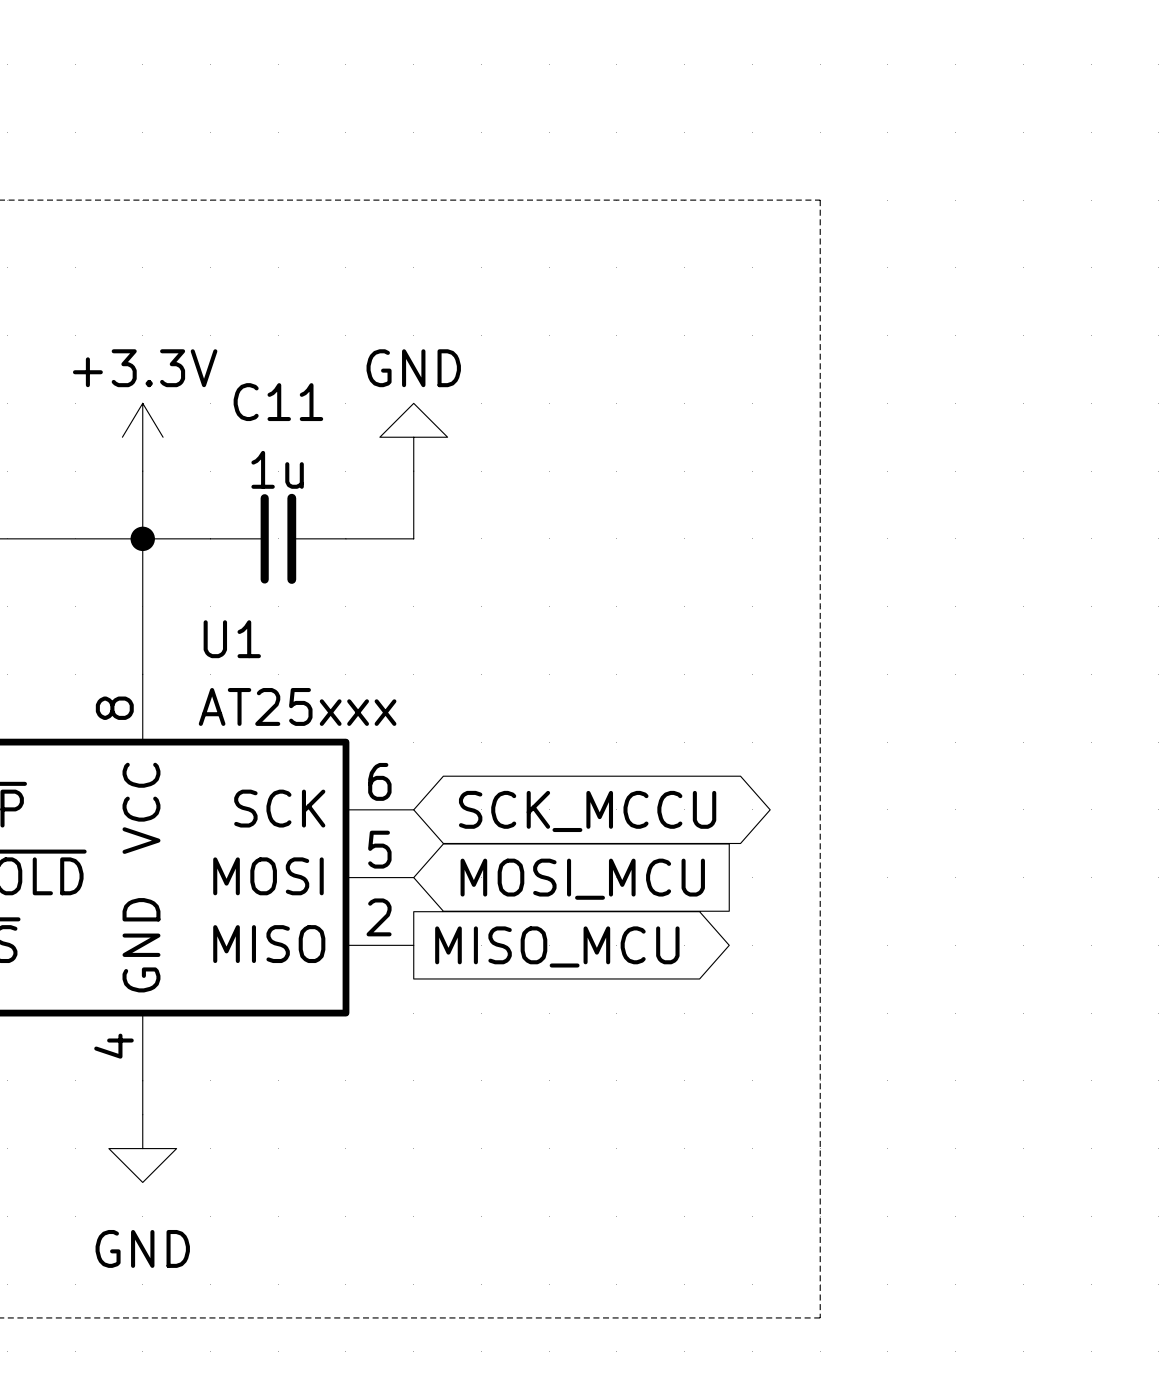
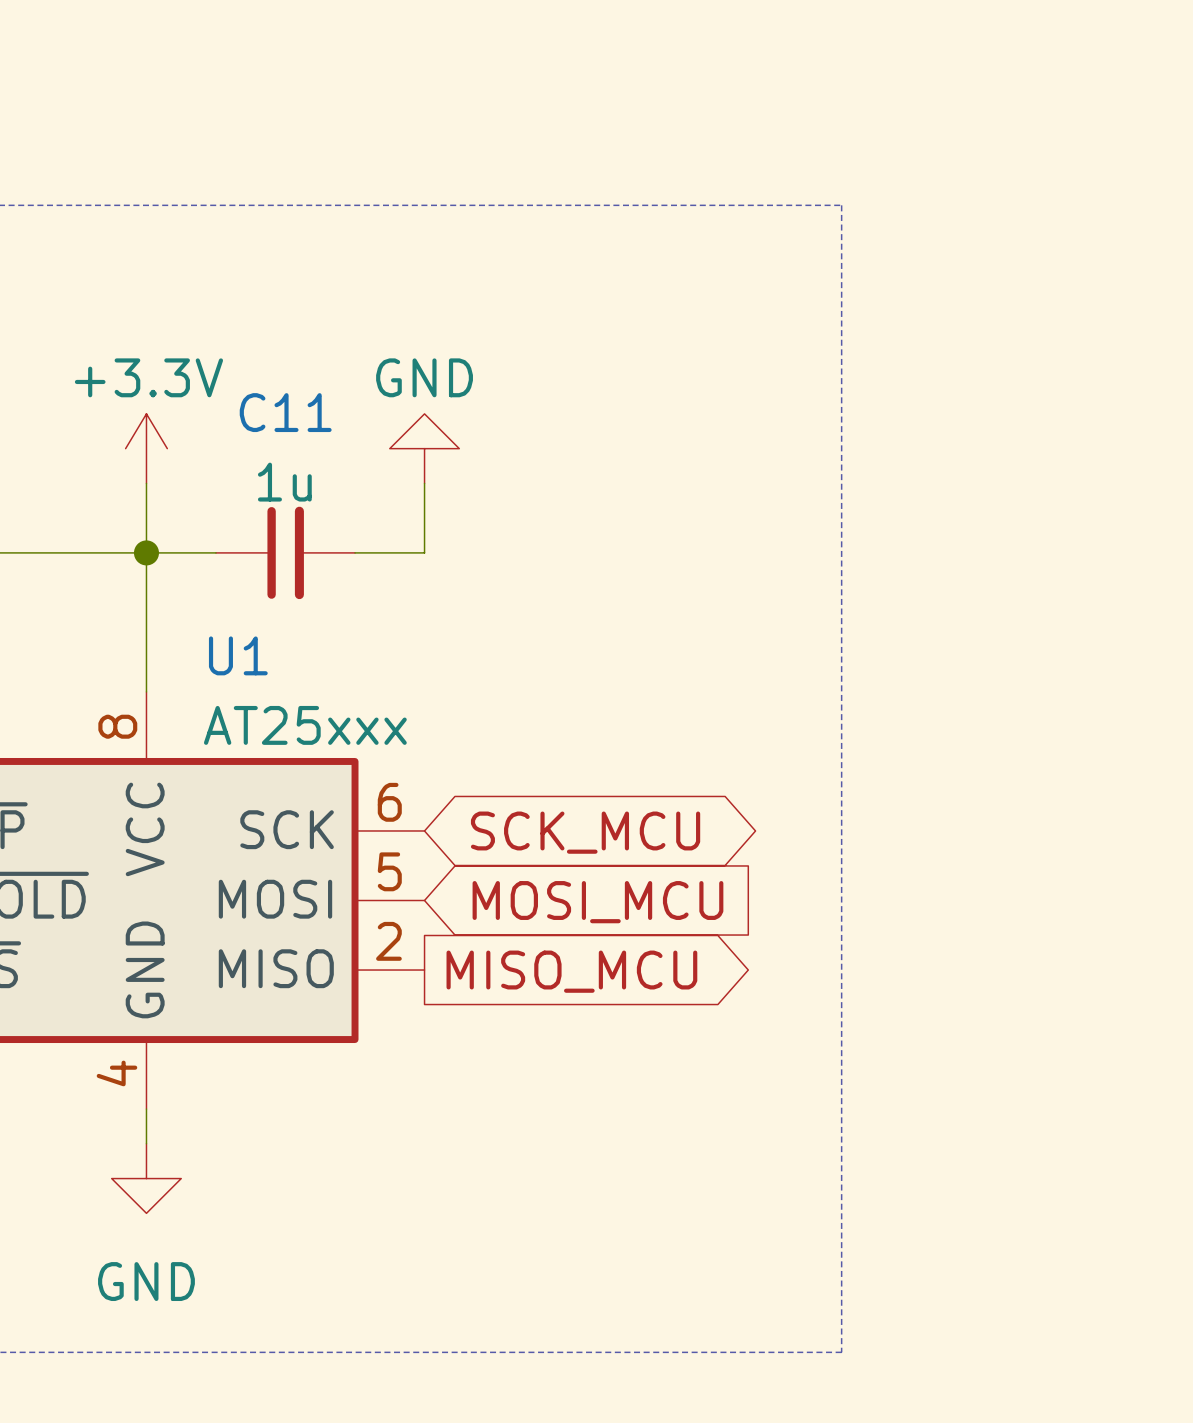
global label: SCK_MCCU (587, 811) -> SCK_MCU (585, 832)

